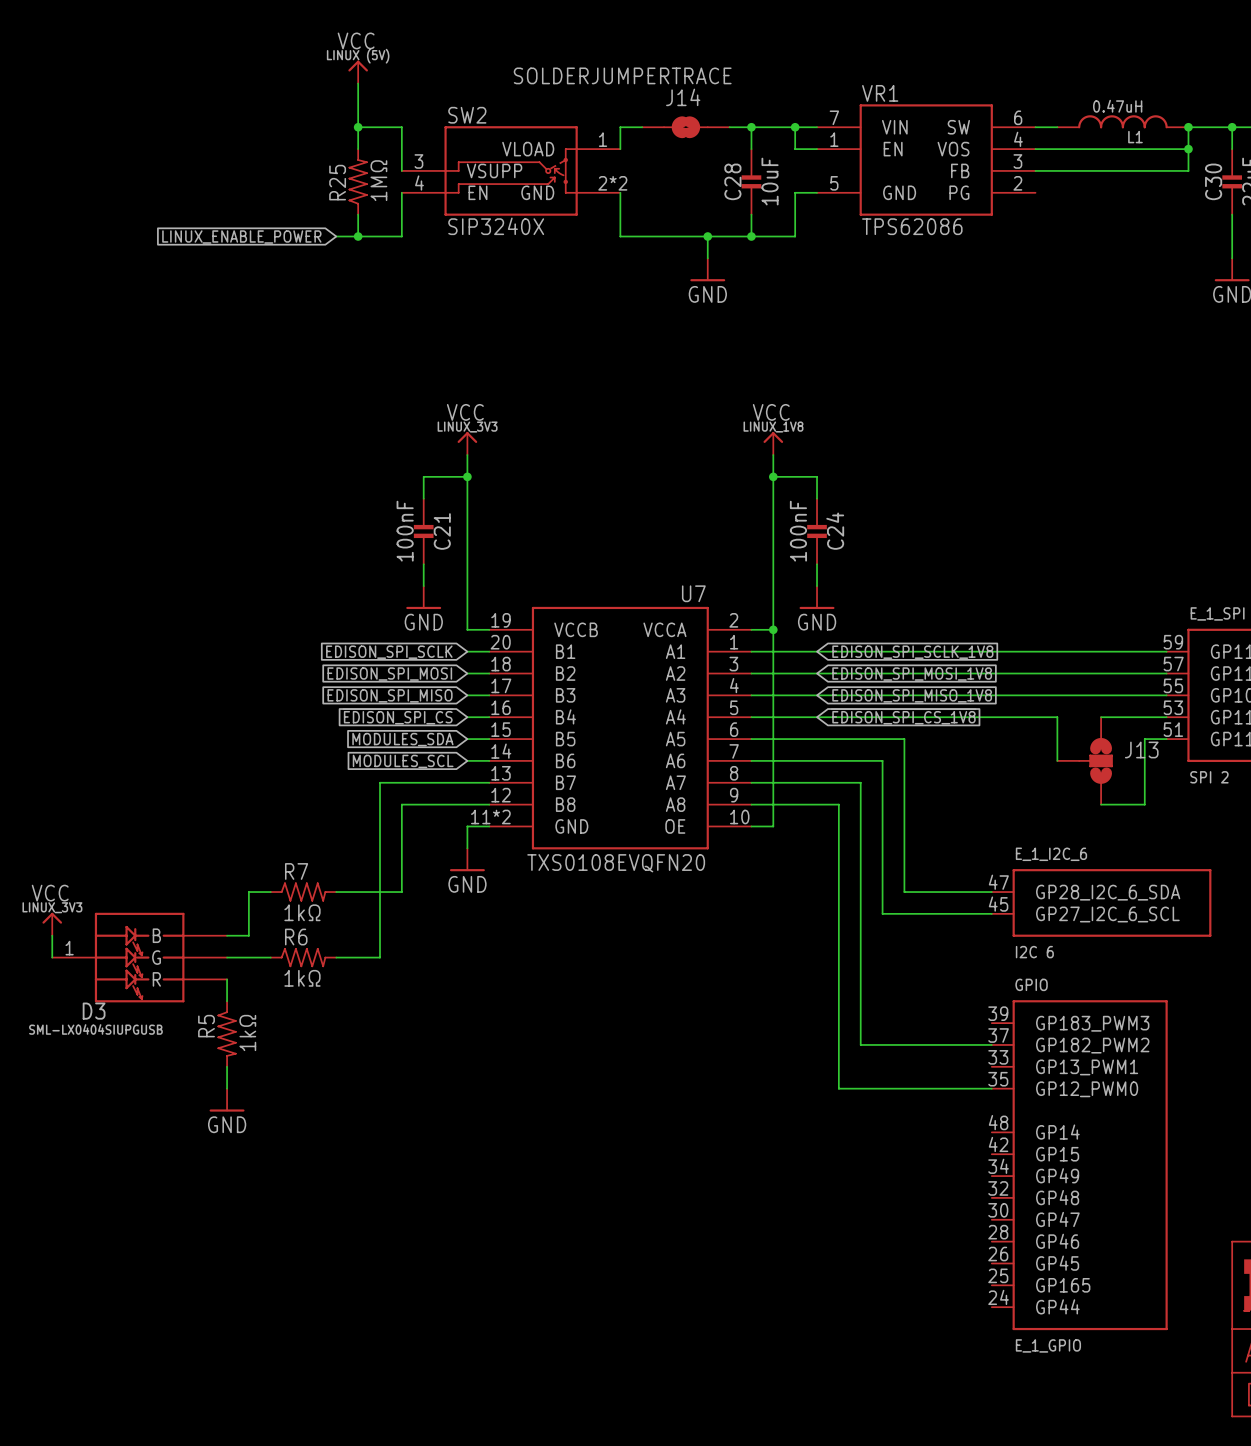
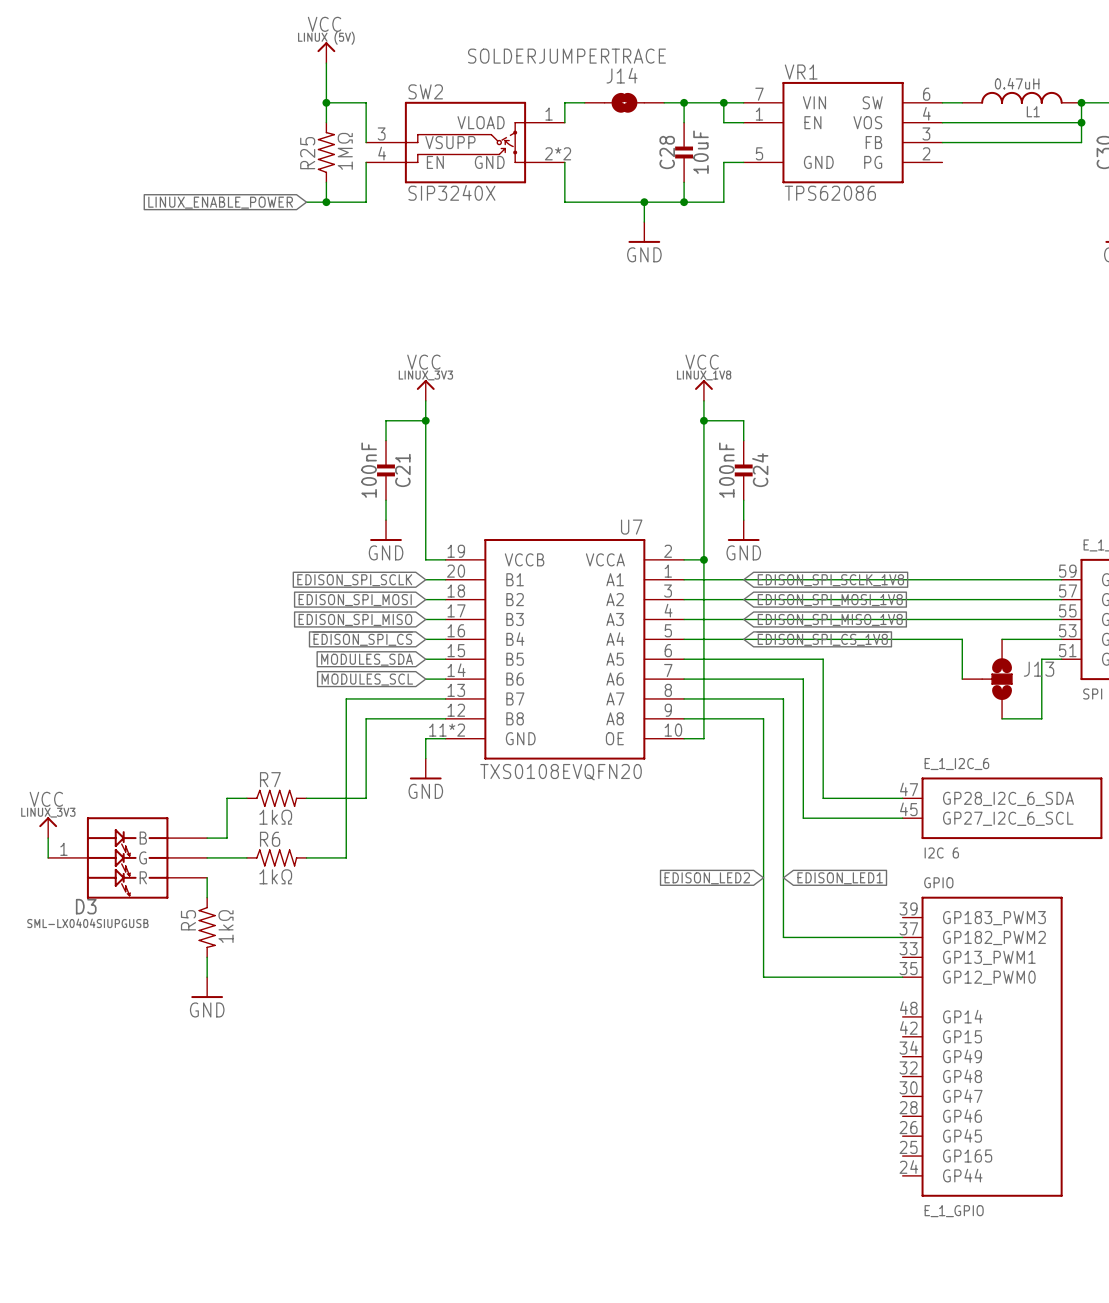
global label: none -> EDISON_LED2 (707, 878)
global label: none -> EDISON_LED1 (840, 878)

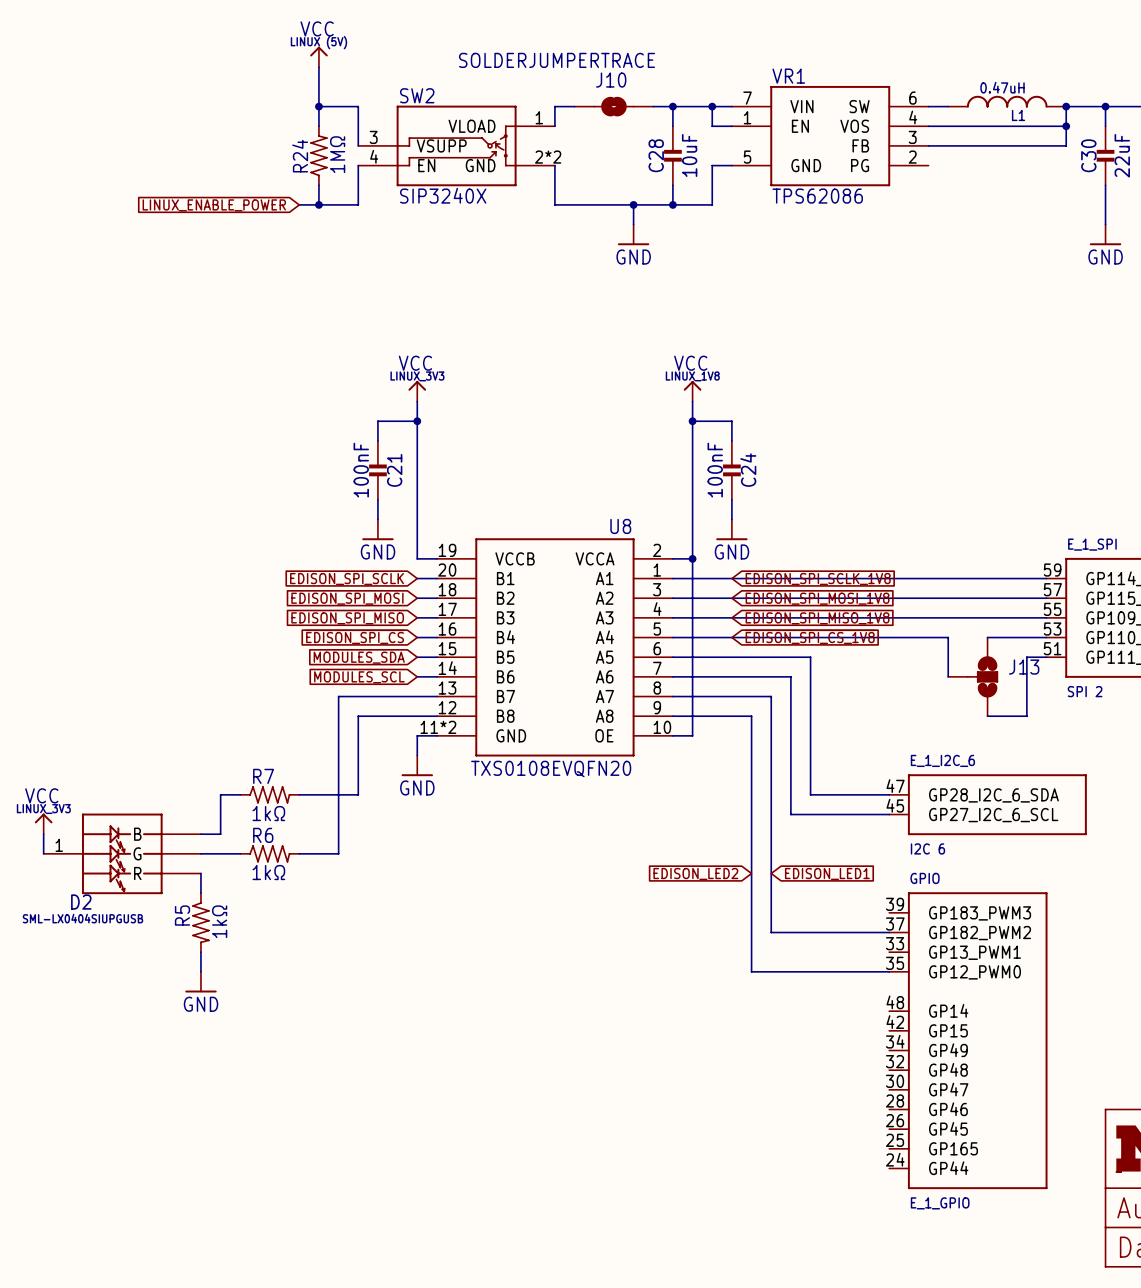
J14 name: J14 (622, 75) -> J10 (611, 80)
R25 name: R25 (307, 153) -> R24 (300, 156)
U7 name: U7 (631, 527) -> U8 (620, 526)
D3 name: D3 (86, 906) -> D2 (81, 902)

